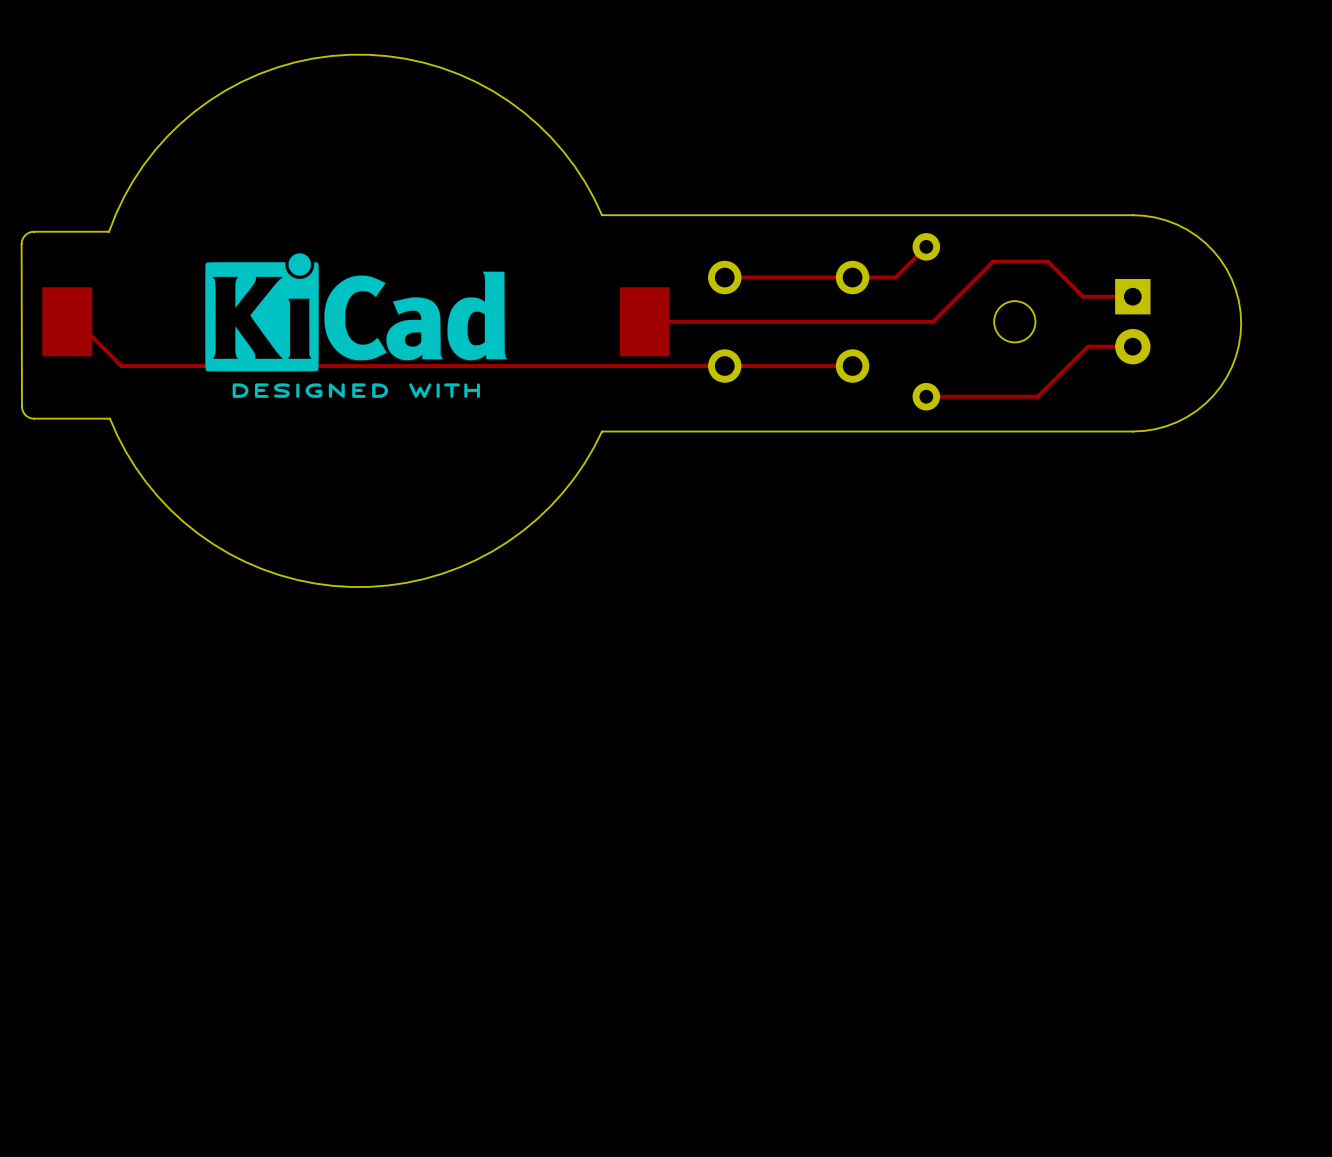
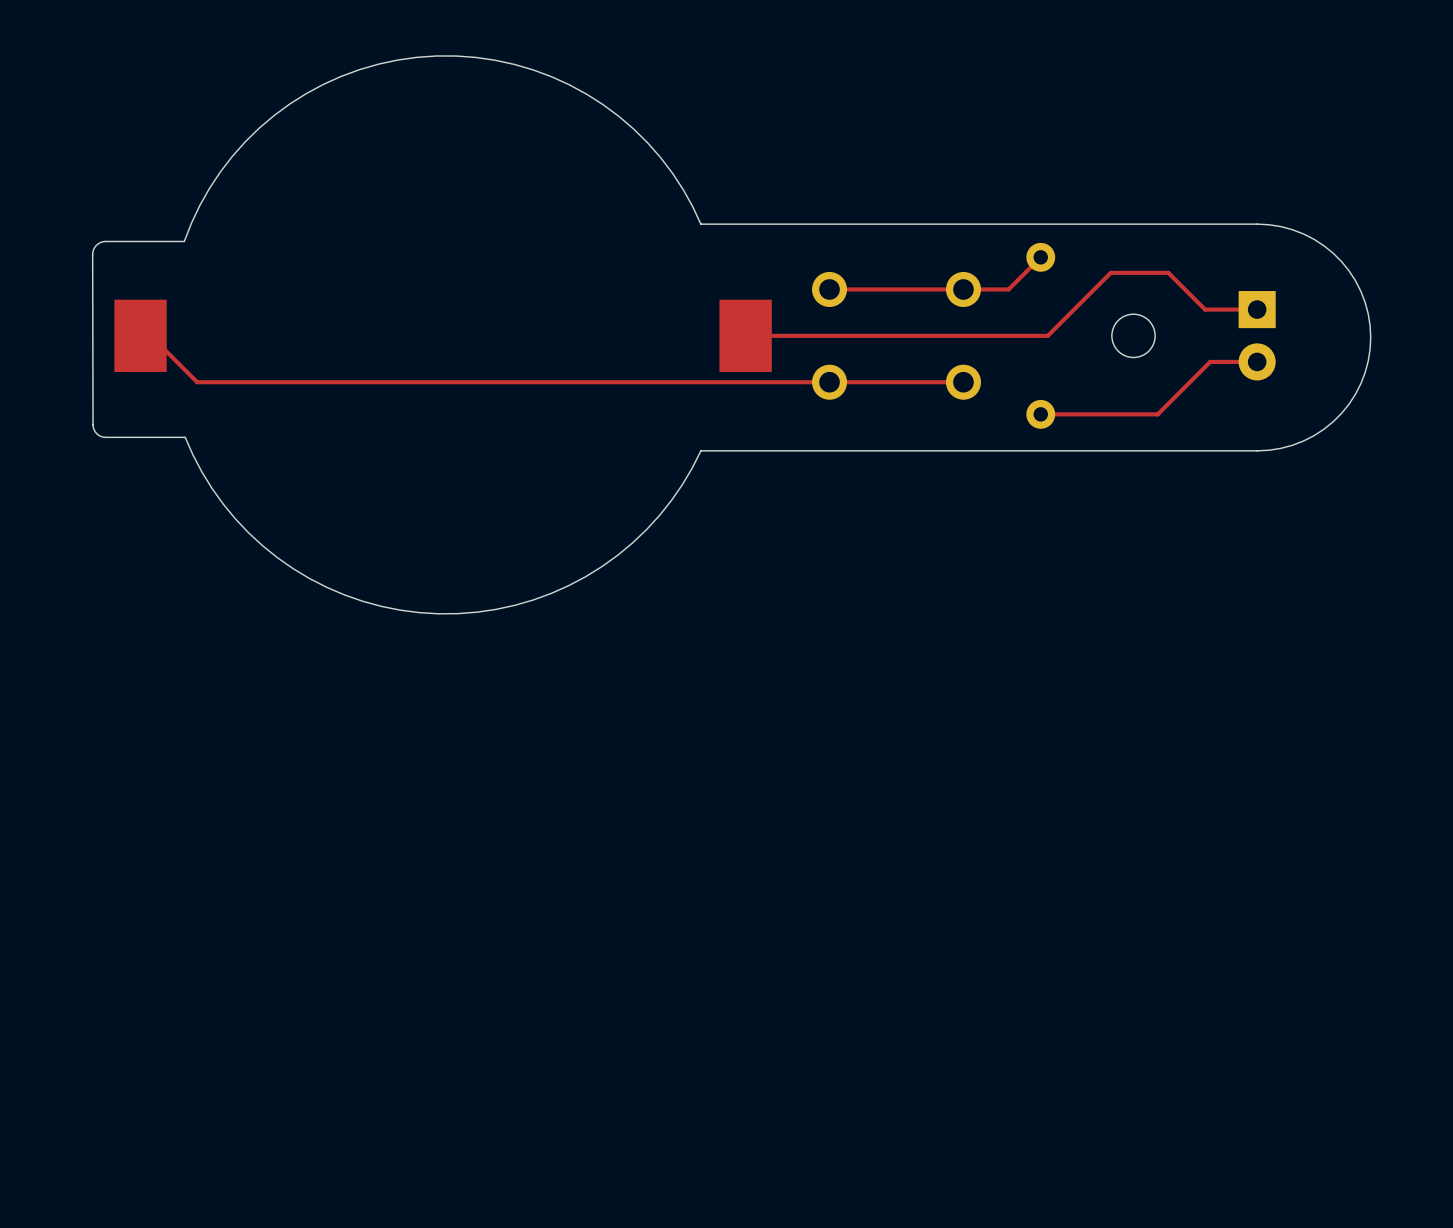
drawing: [205, 253, 508, 398] -> none

